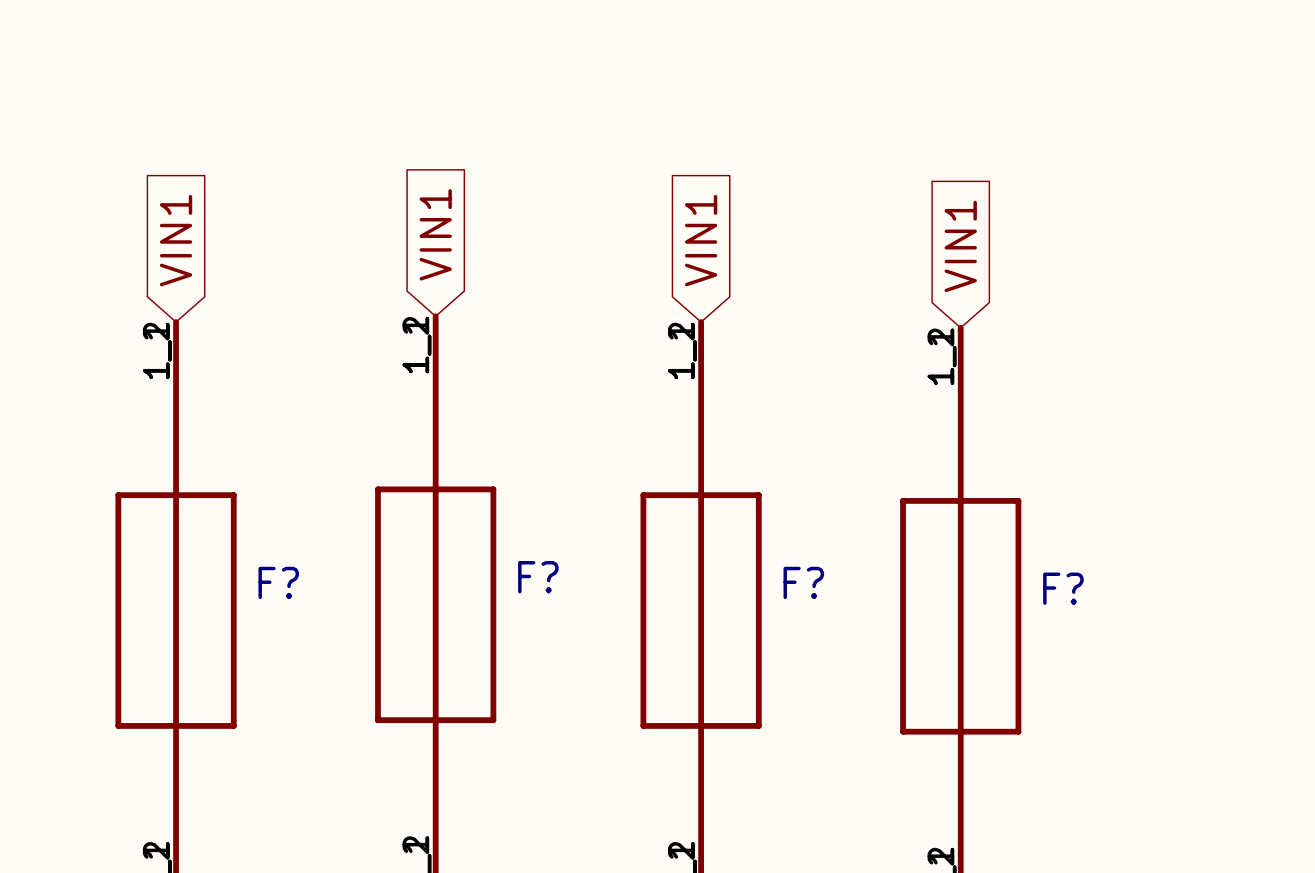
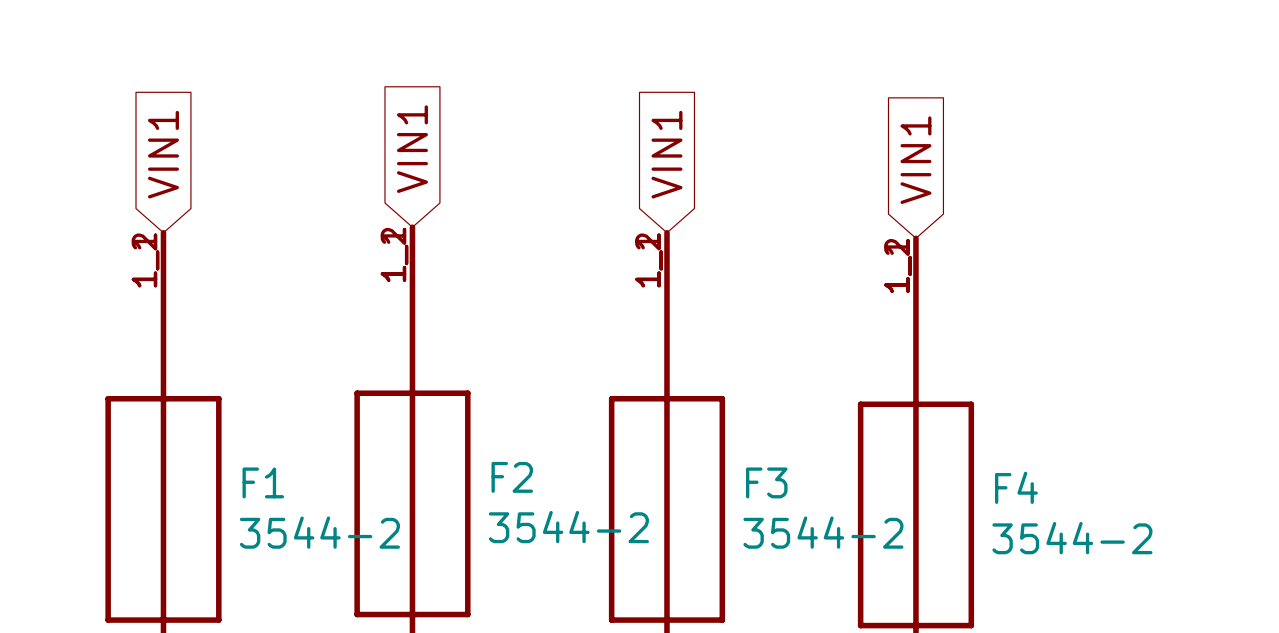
F? name: F? (538, 577) -> F2 (512, 477)
F? name: F? (278, 582) -> F1 (263, 482)
F? name: F? (803, 582) -> F3 (766, 482)
F? name: F? (1063, 588) -> F4 (1016, 487)
F? value: none -> 3544-2 (568, 527)
F? value: none -> 3544-2 (319, 532)
F? value: none -> 3544-2 (823, 532)
F? value: none -> 3544-2 (1072, 538)

